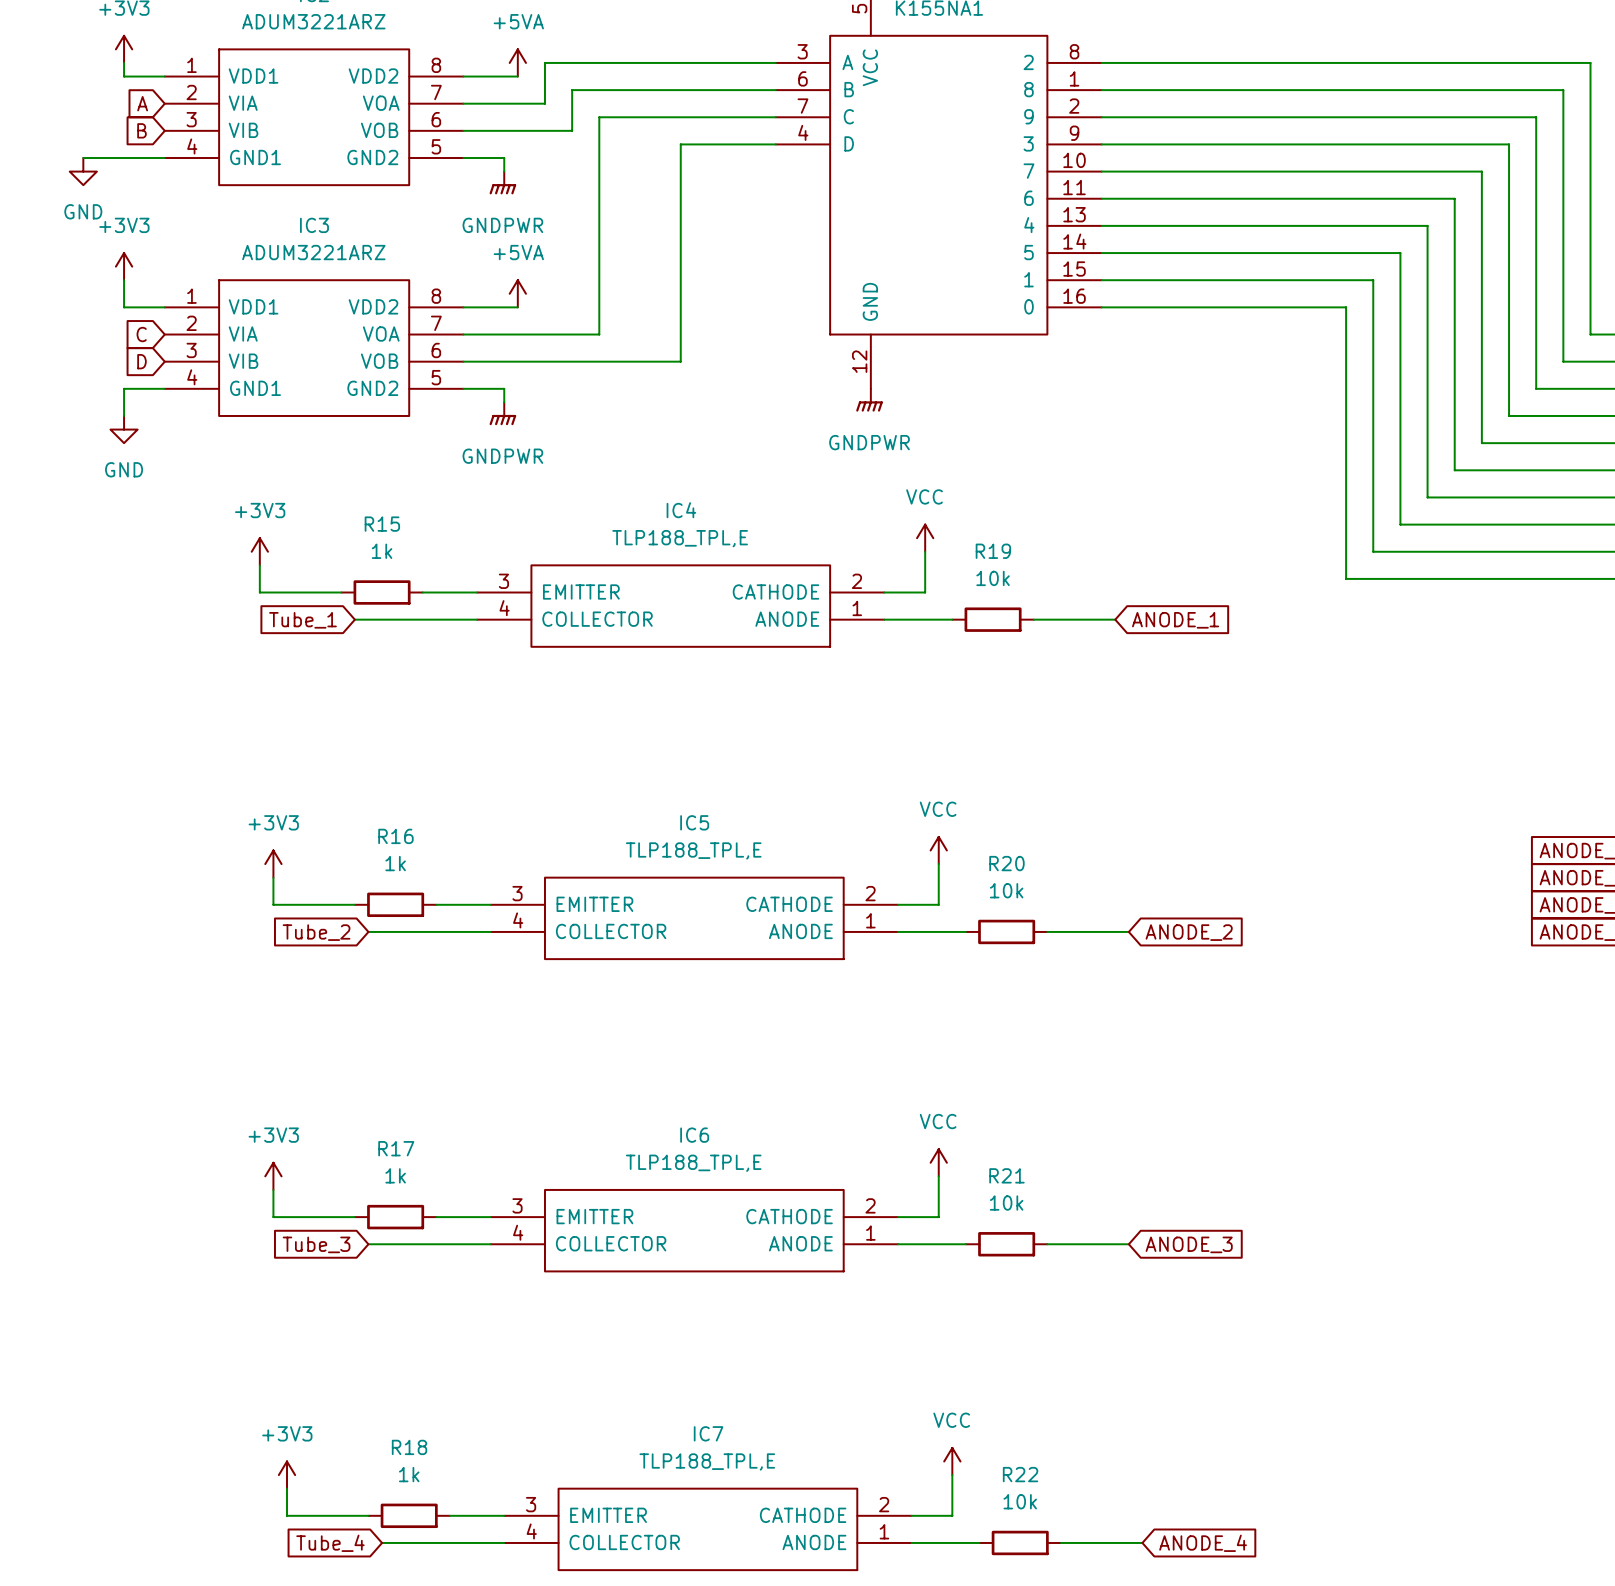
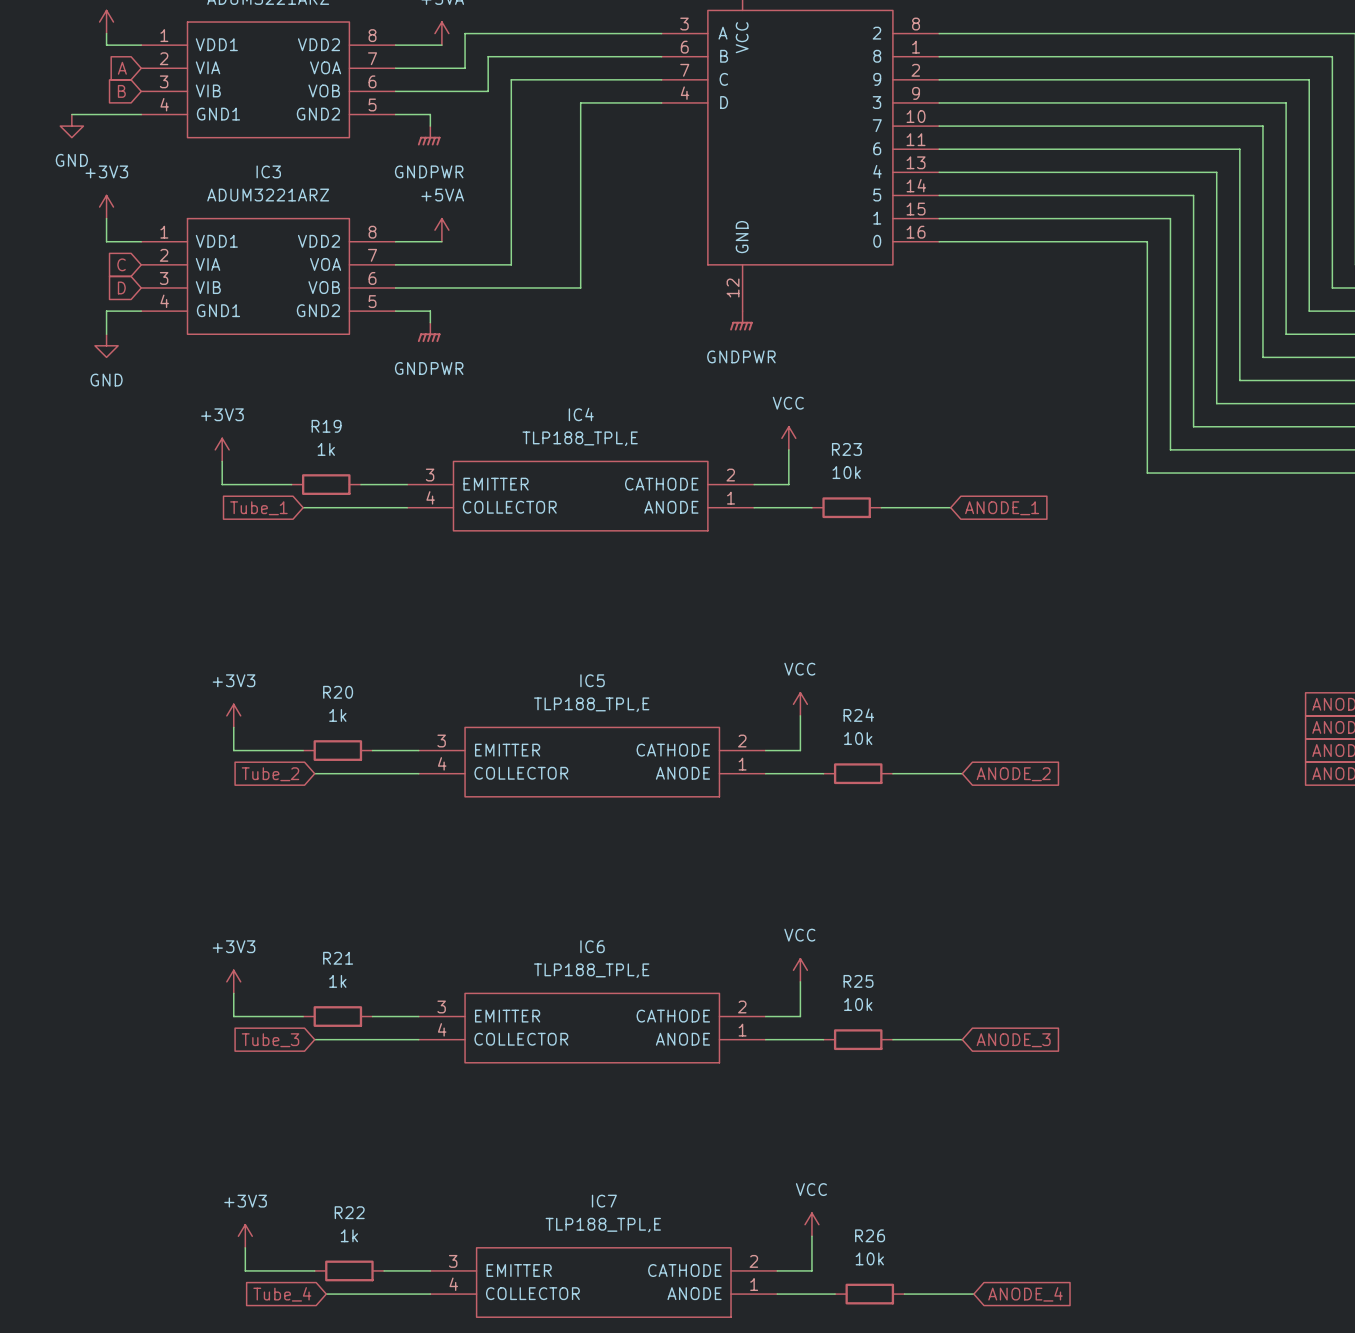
R15 name: R15 (382, 524) -> R19 (326, 426)
R19 name: R19 (993, 551) -> R23 (846, 449)
R16 name: R16 (395, 836) -> R20 (338, 692)
R20 name: R20 (1006, 863) -> R24 (858, 715)
R17 name: R17 (396, 1148) -> R21 (338, 958)
R21 name: R21 (1006, 1175) -> R25 (858, 981)
R18 name: R18 (409, 1447) -> R22 (349, 1212)
R22 name: R22 (1020, 1474) -> R26 (870, 1235)

